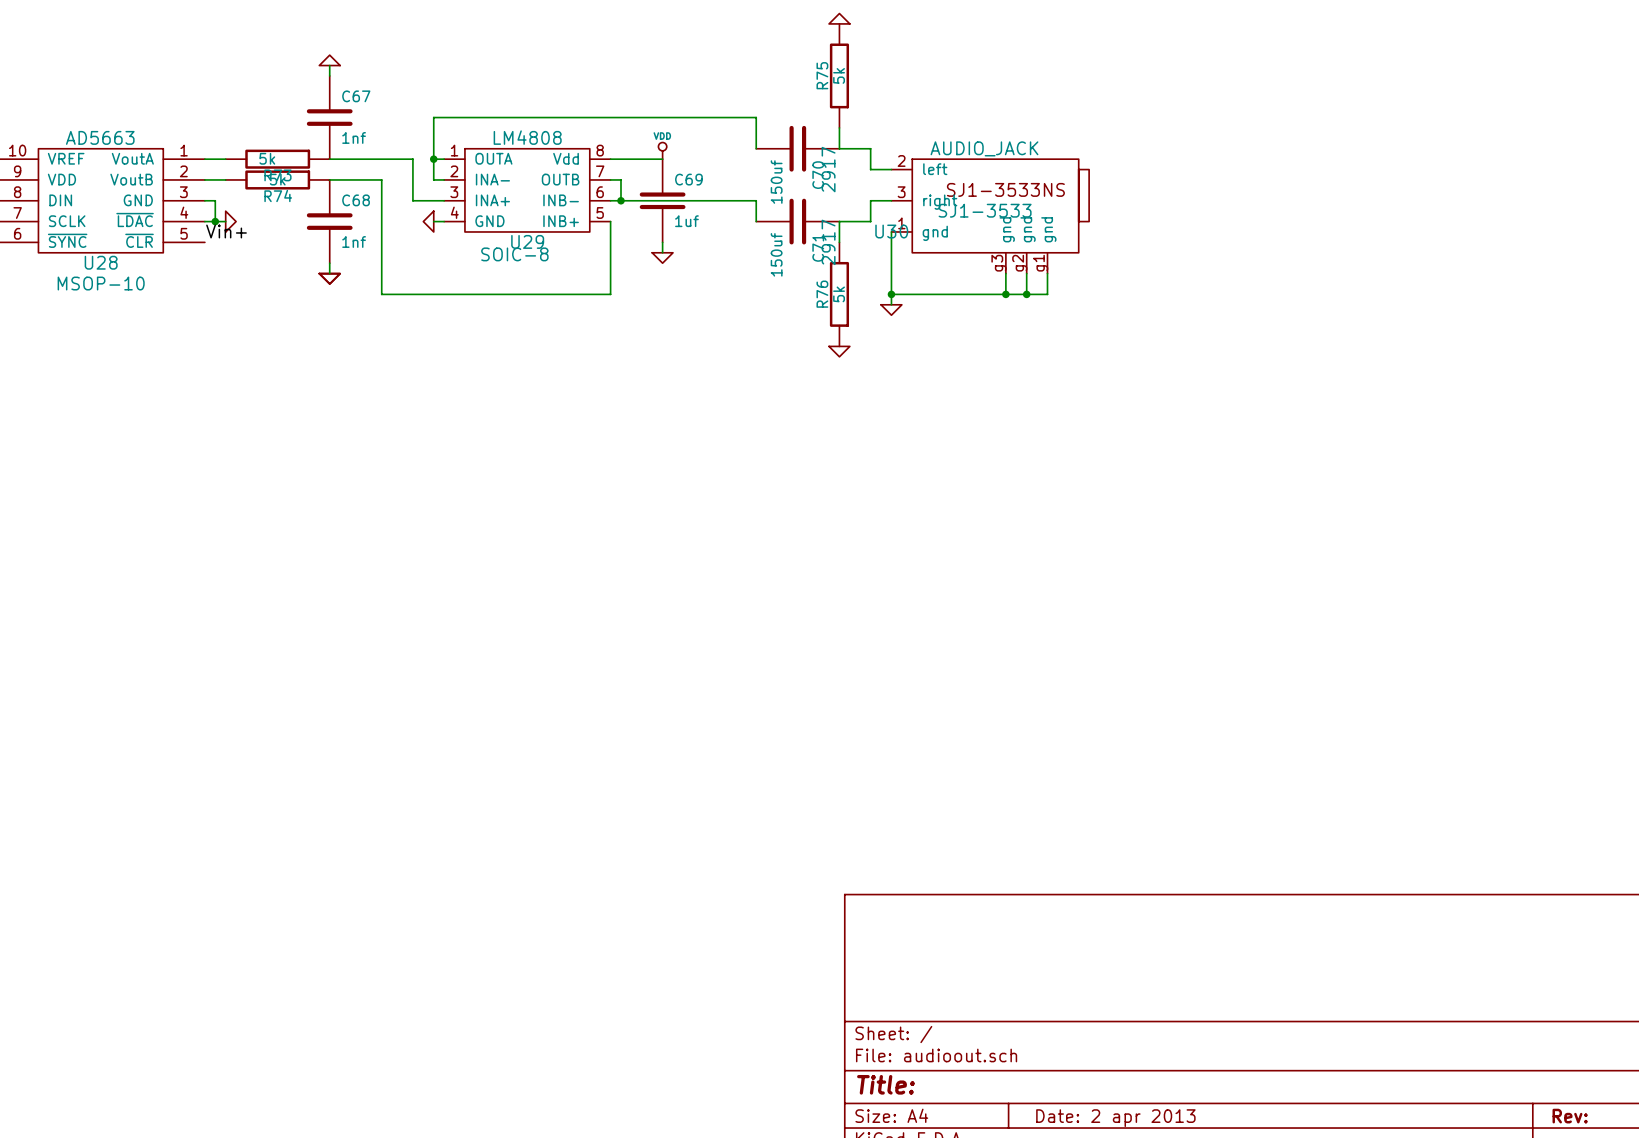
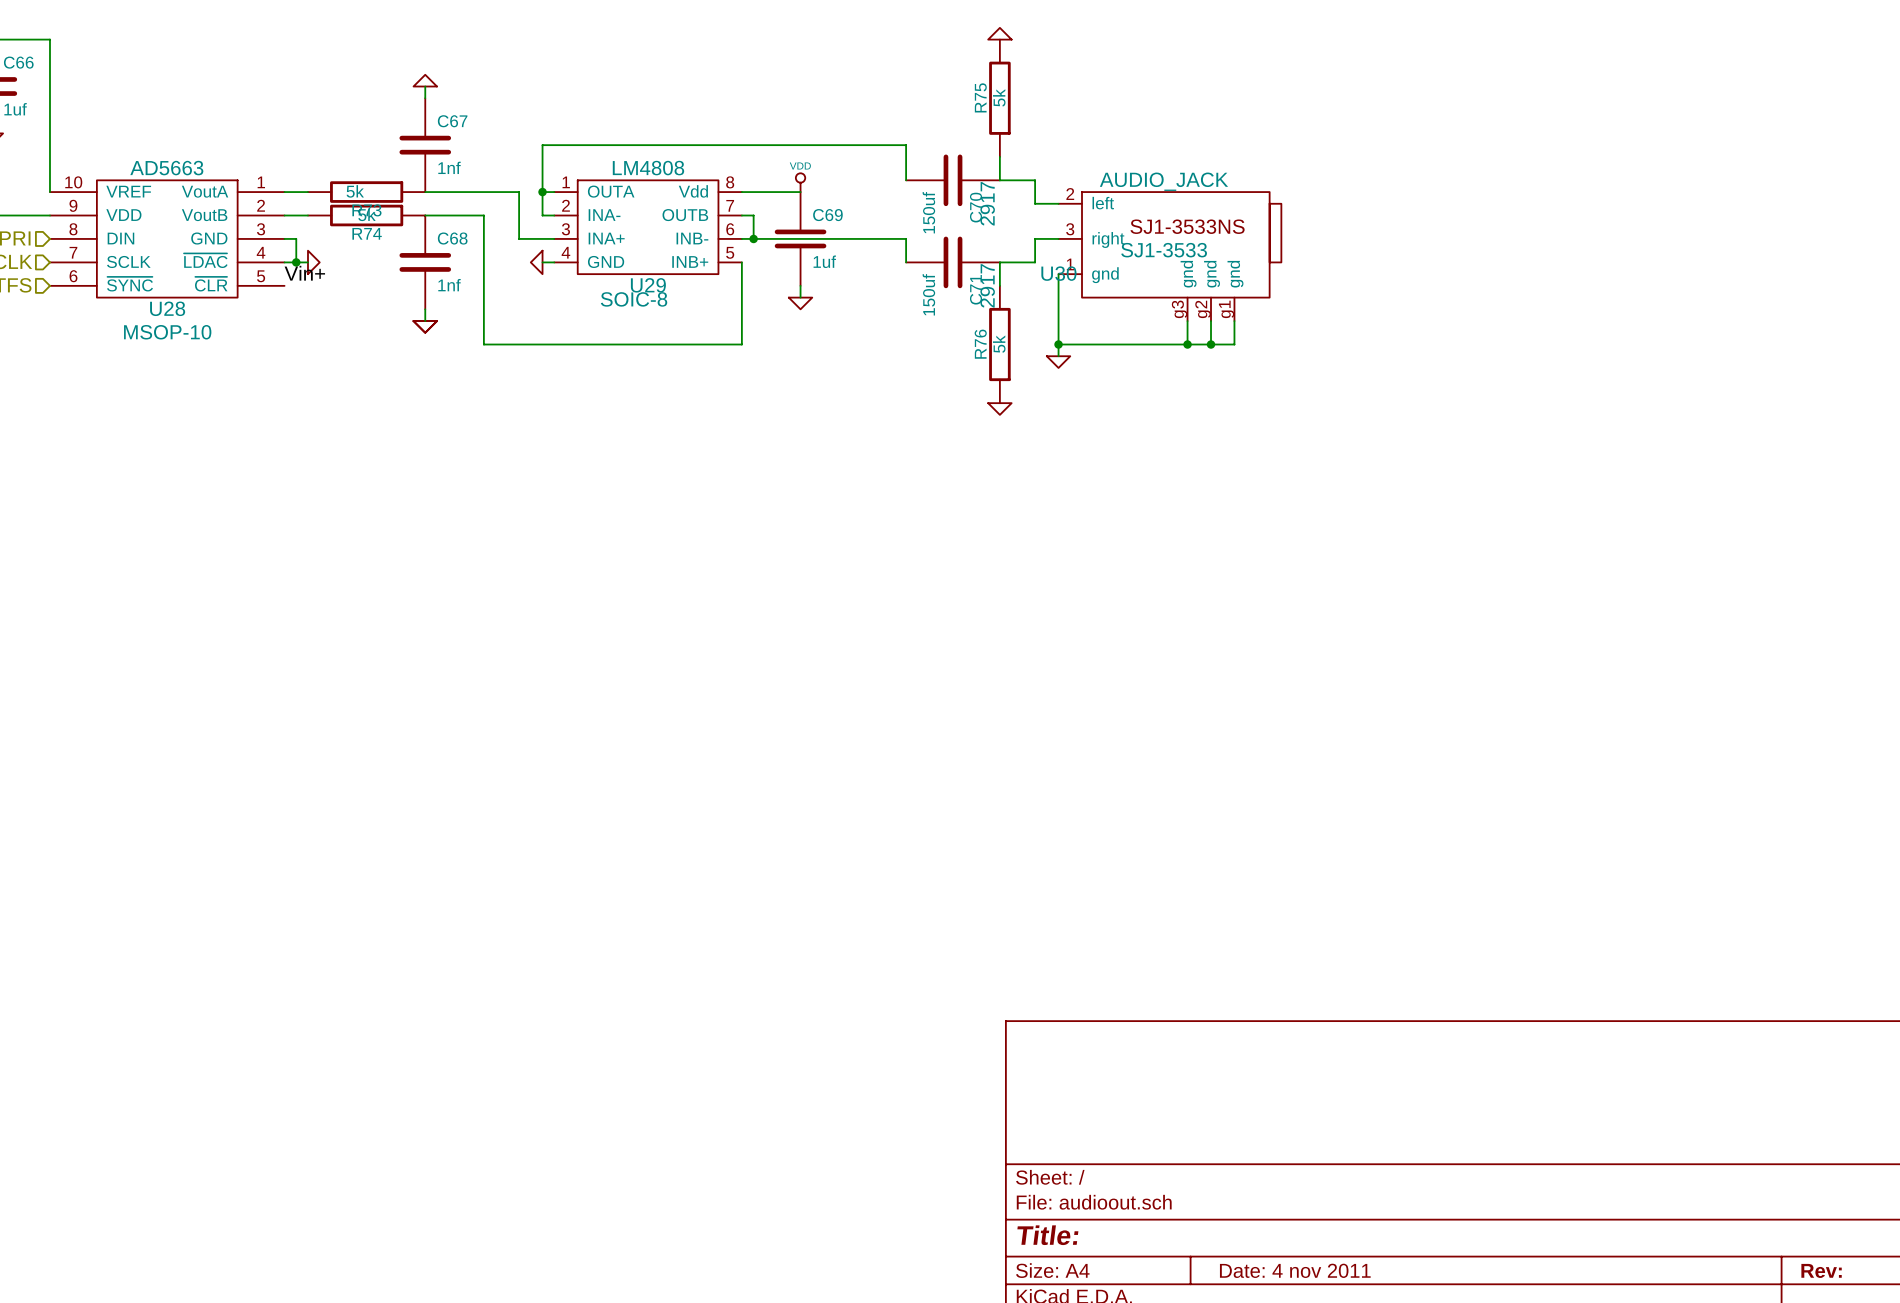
title block: Date: 2 apr 2013 (1115, 1118) -> Date: 4 nov 2011 (1295, 1270)

